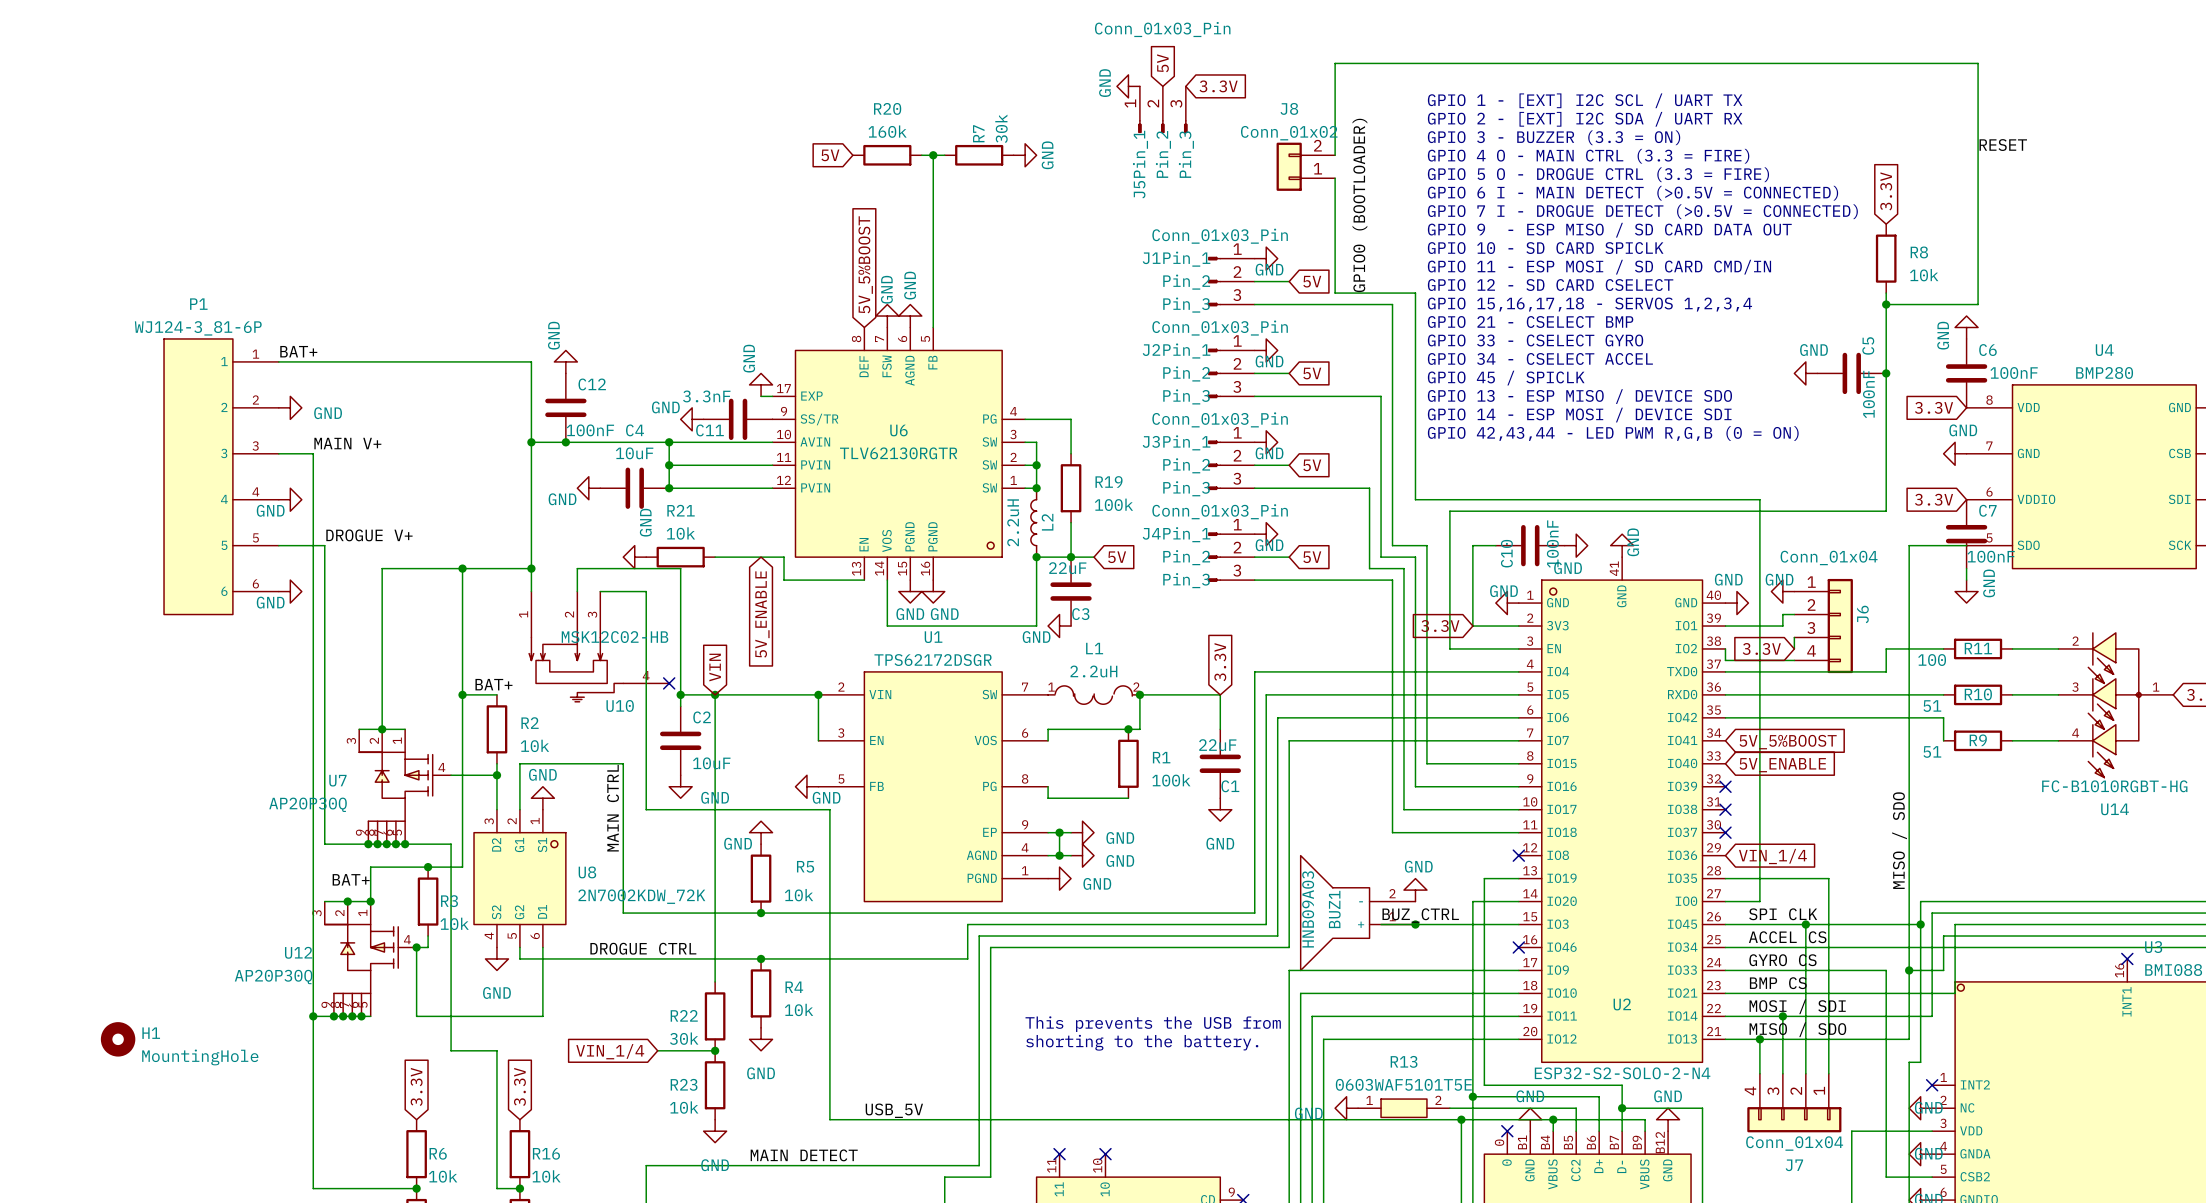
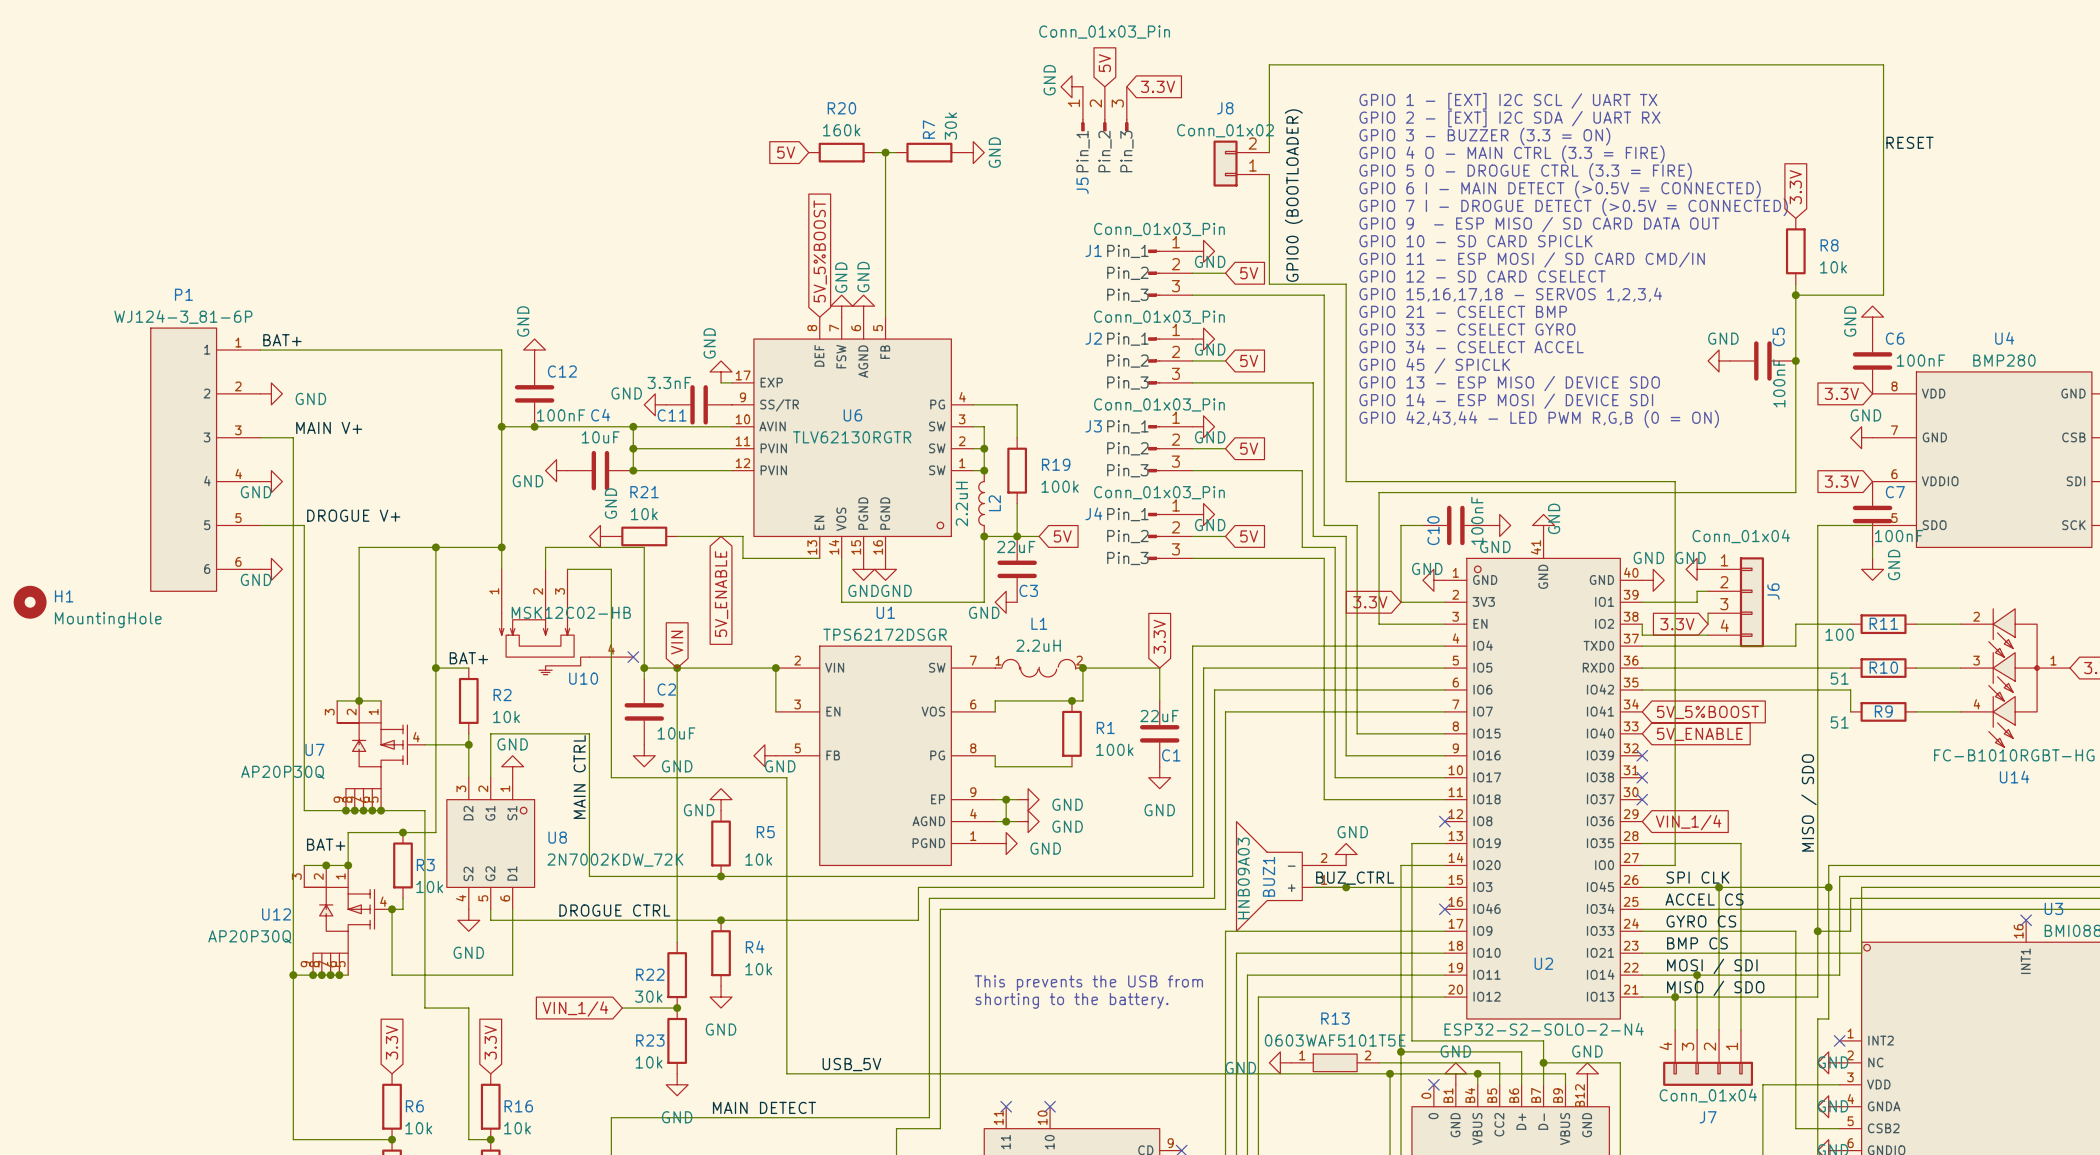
H1 position: (118, 1039) -> (30, 602)

